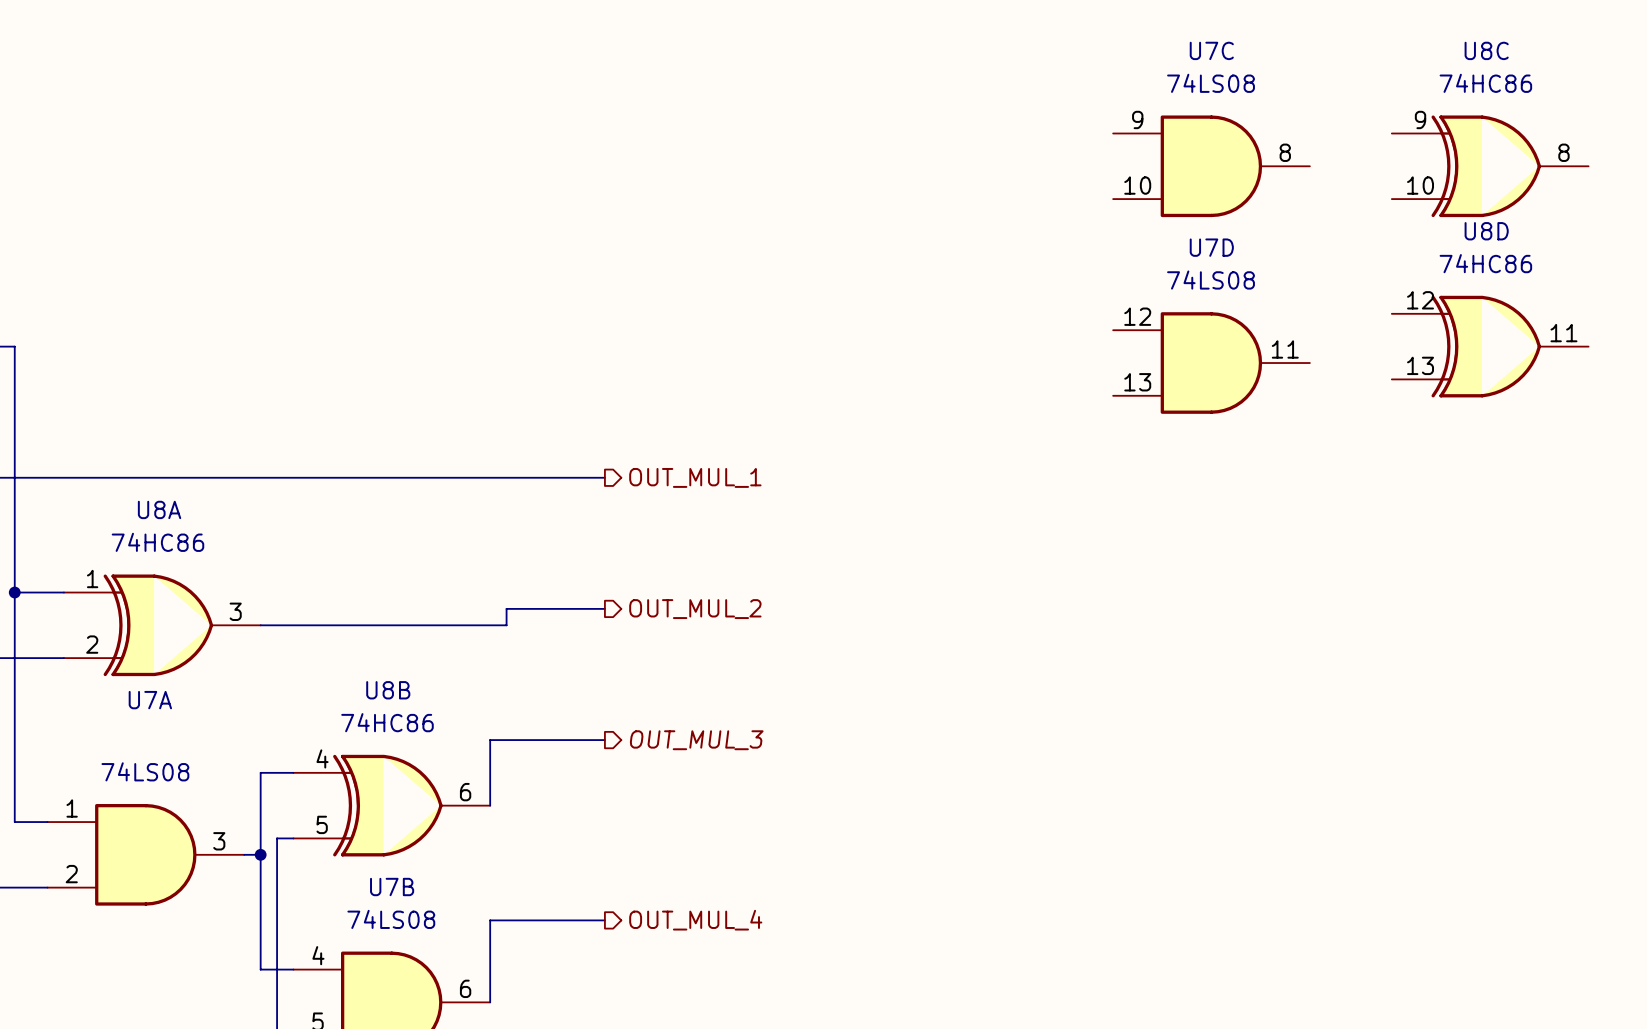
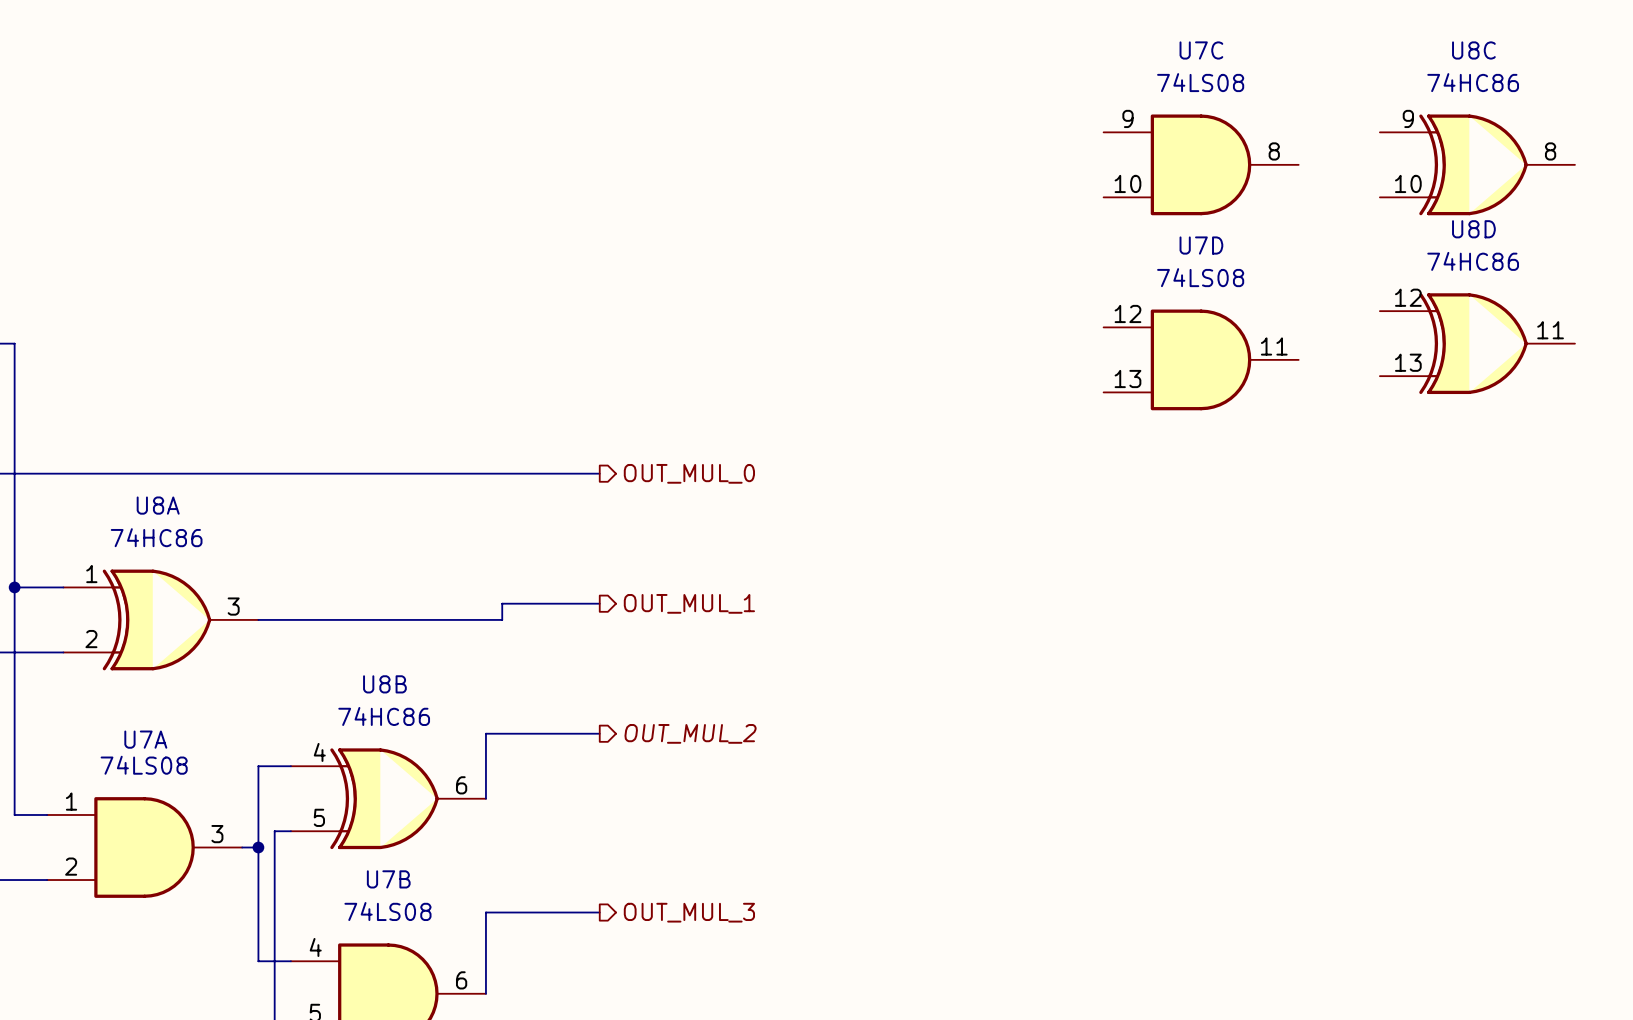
hierarchical label: OUT_MUL_1 (695, 477) -> OUT_MUL_0 (689, 473)
hierarchical label: OUT_MUL_2 (695, 609) -> OUT_MUL_1 (689, 603)
U7A name position: U7A (150, 700) -> U7A (145, 739)
hierarchical label: OUT_MUL_3 (696, 740) -> OUT_MUL_2 (690, 733)
hierarchical label: OUT_MUL_4 (695, 920) -> OUT_MUL_3 (689, 912)

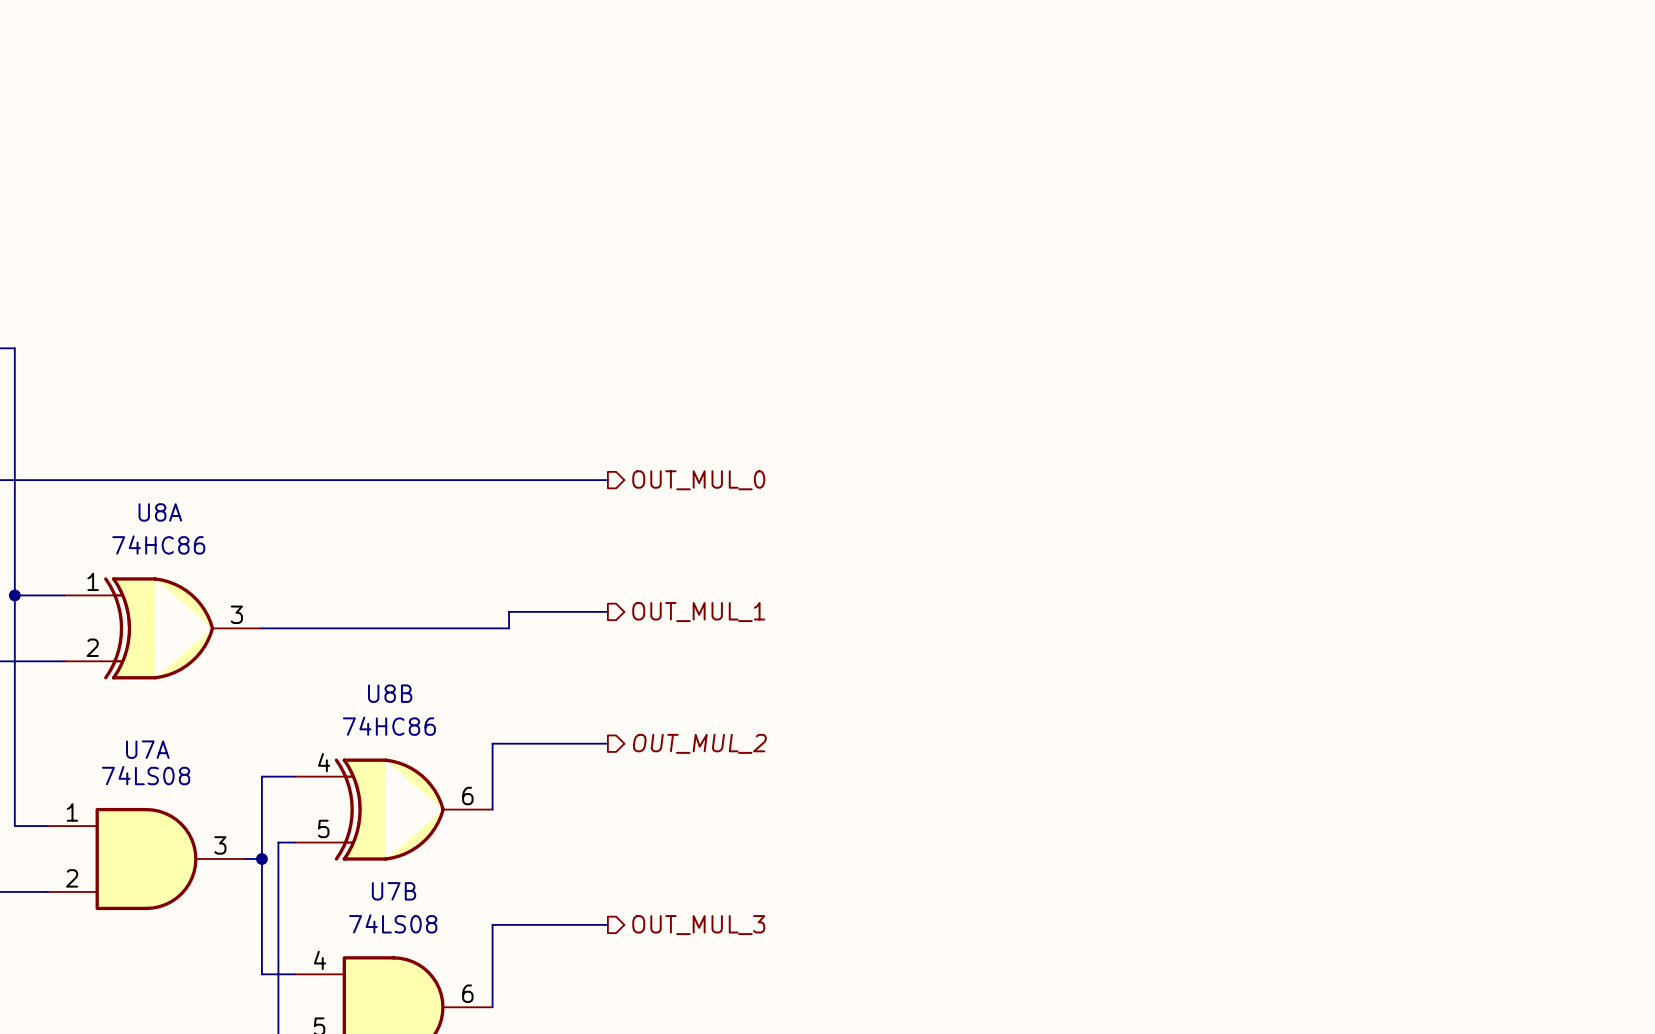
U7C: 74LS08 (1201, 164) -> none
U8C: 74HC86 (1477, 164) -> none
U8D: 74HC86 (1477, 343) -> none
U7D: 74LS08 (1201, 359) -> none

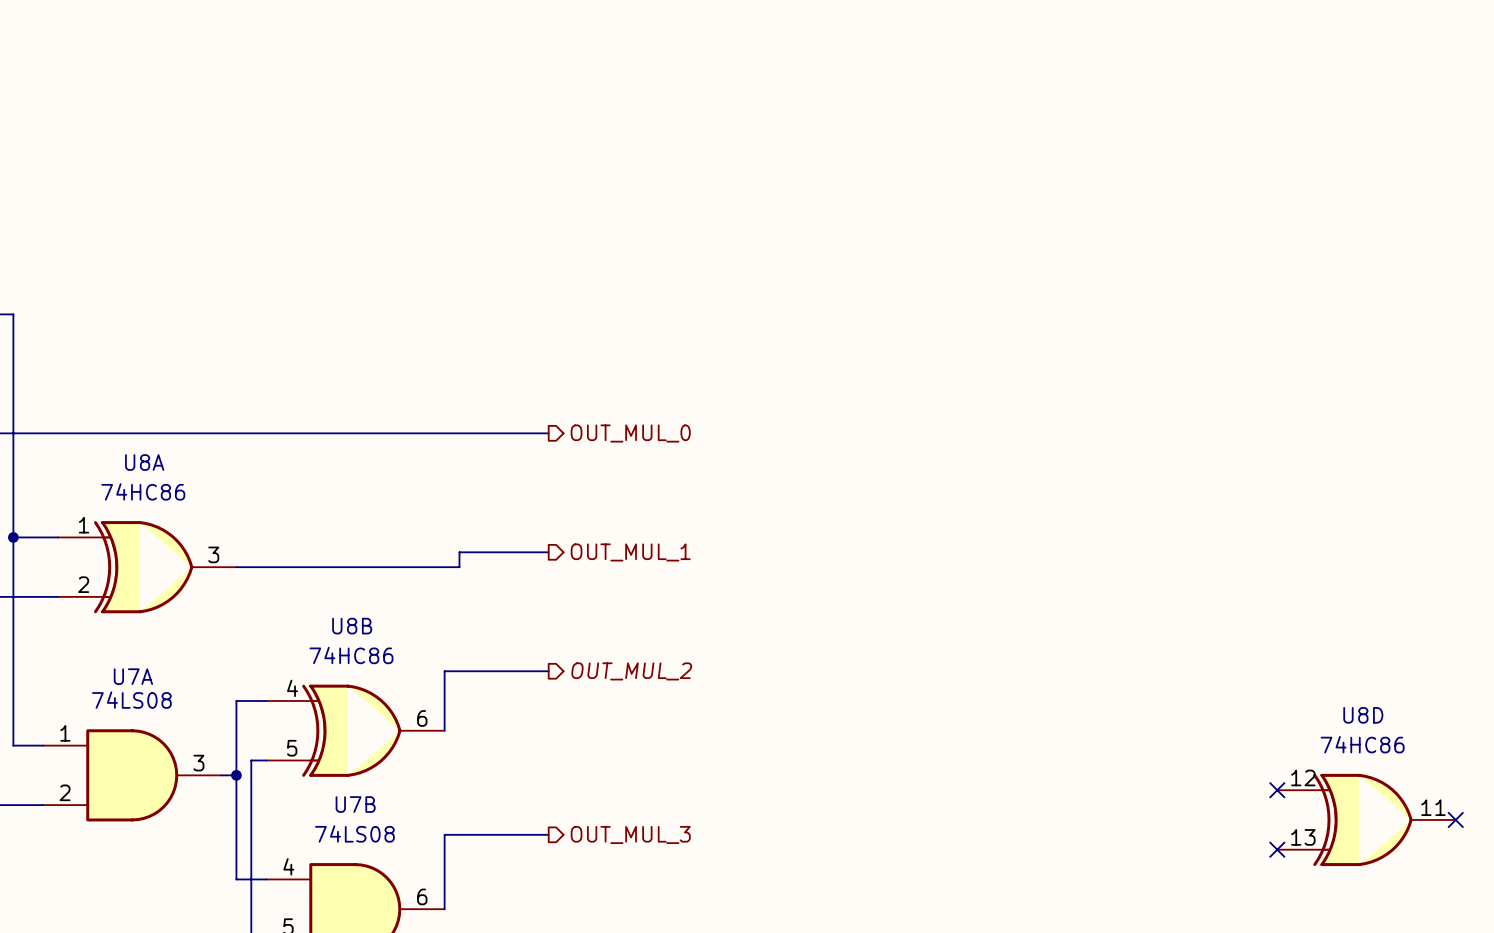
no-connect mark: none -> (1277, 790)
U8D: none -> 74HC86 (1366, 819)
no-connect mark: none -> (1455, 819)
no-connect mark: none -> (1277, 849)

